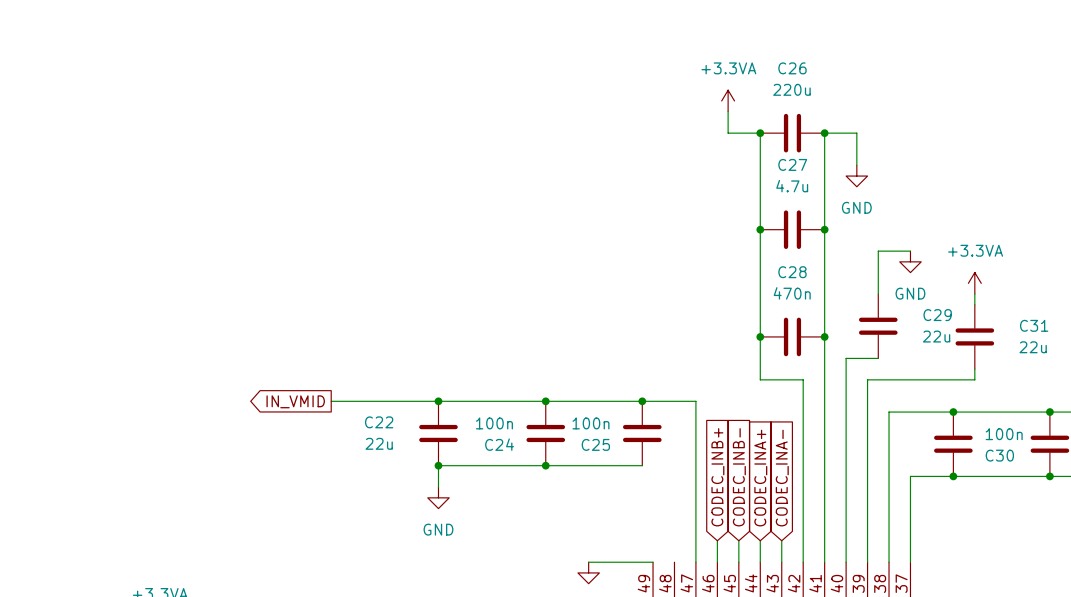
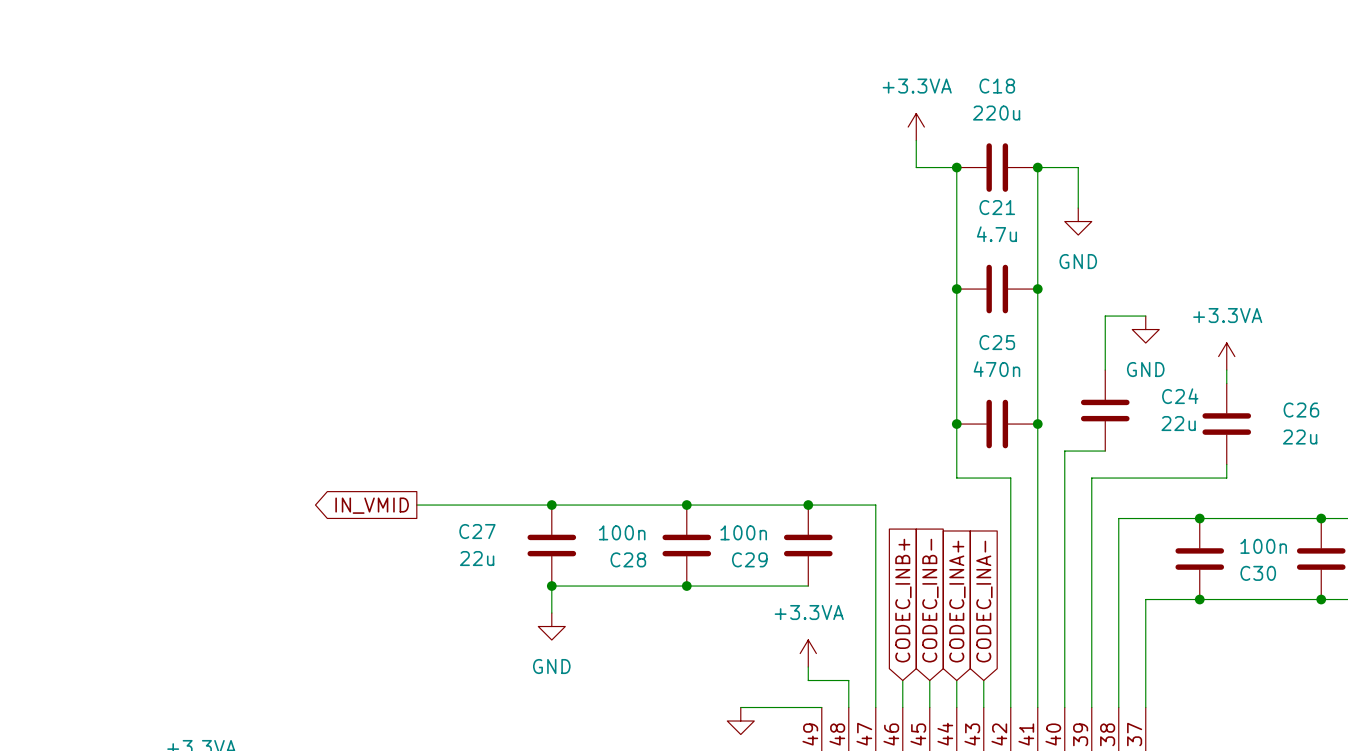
C26 name: C26 (792, 68) -> C18 (997, 86)
C27 name: C27 (792, 164) -> C21 (997, 207)
C28 name: C28 (792, 272) -> C25 (997, 342)
C29 name: C29 (937, 315) -> C24 (1180, 396)
C31 name: C31 (1034, 325) -> C26 (1301, 410)
C22 name: C22 (379, 422) -> C27 (477, 531)
C24 name: C24 (499, 444) -> C28 (628, 559)
C25 name: C25 (595, 444) -> C29 (749, 559)
power symbol: none -> +3.3VA (808, 653)
wire: none -> (808, 667) (808, 680) (848, 680) (848, 707)

